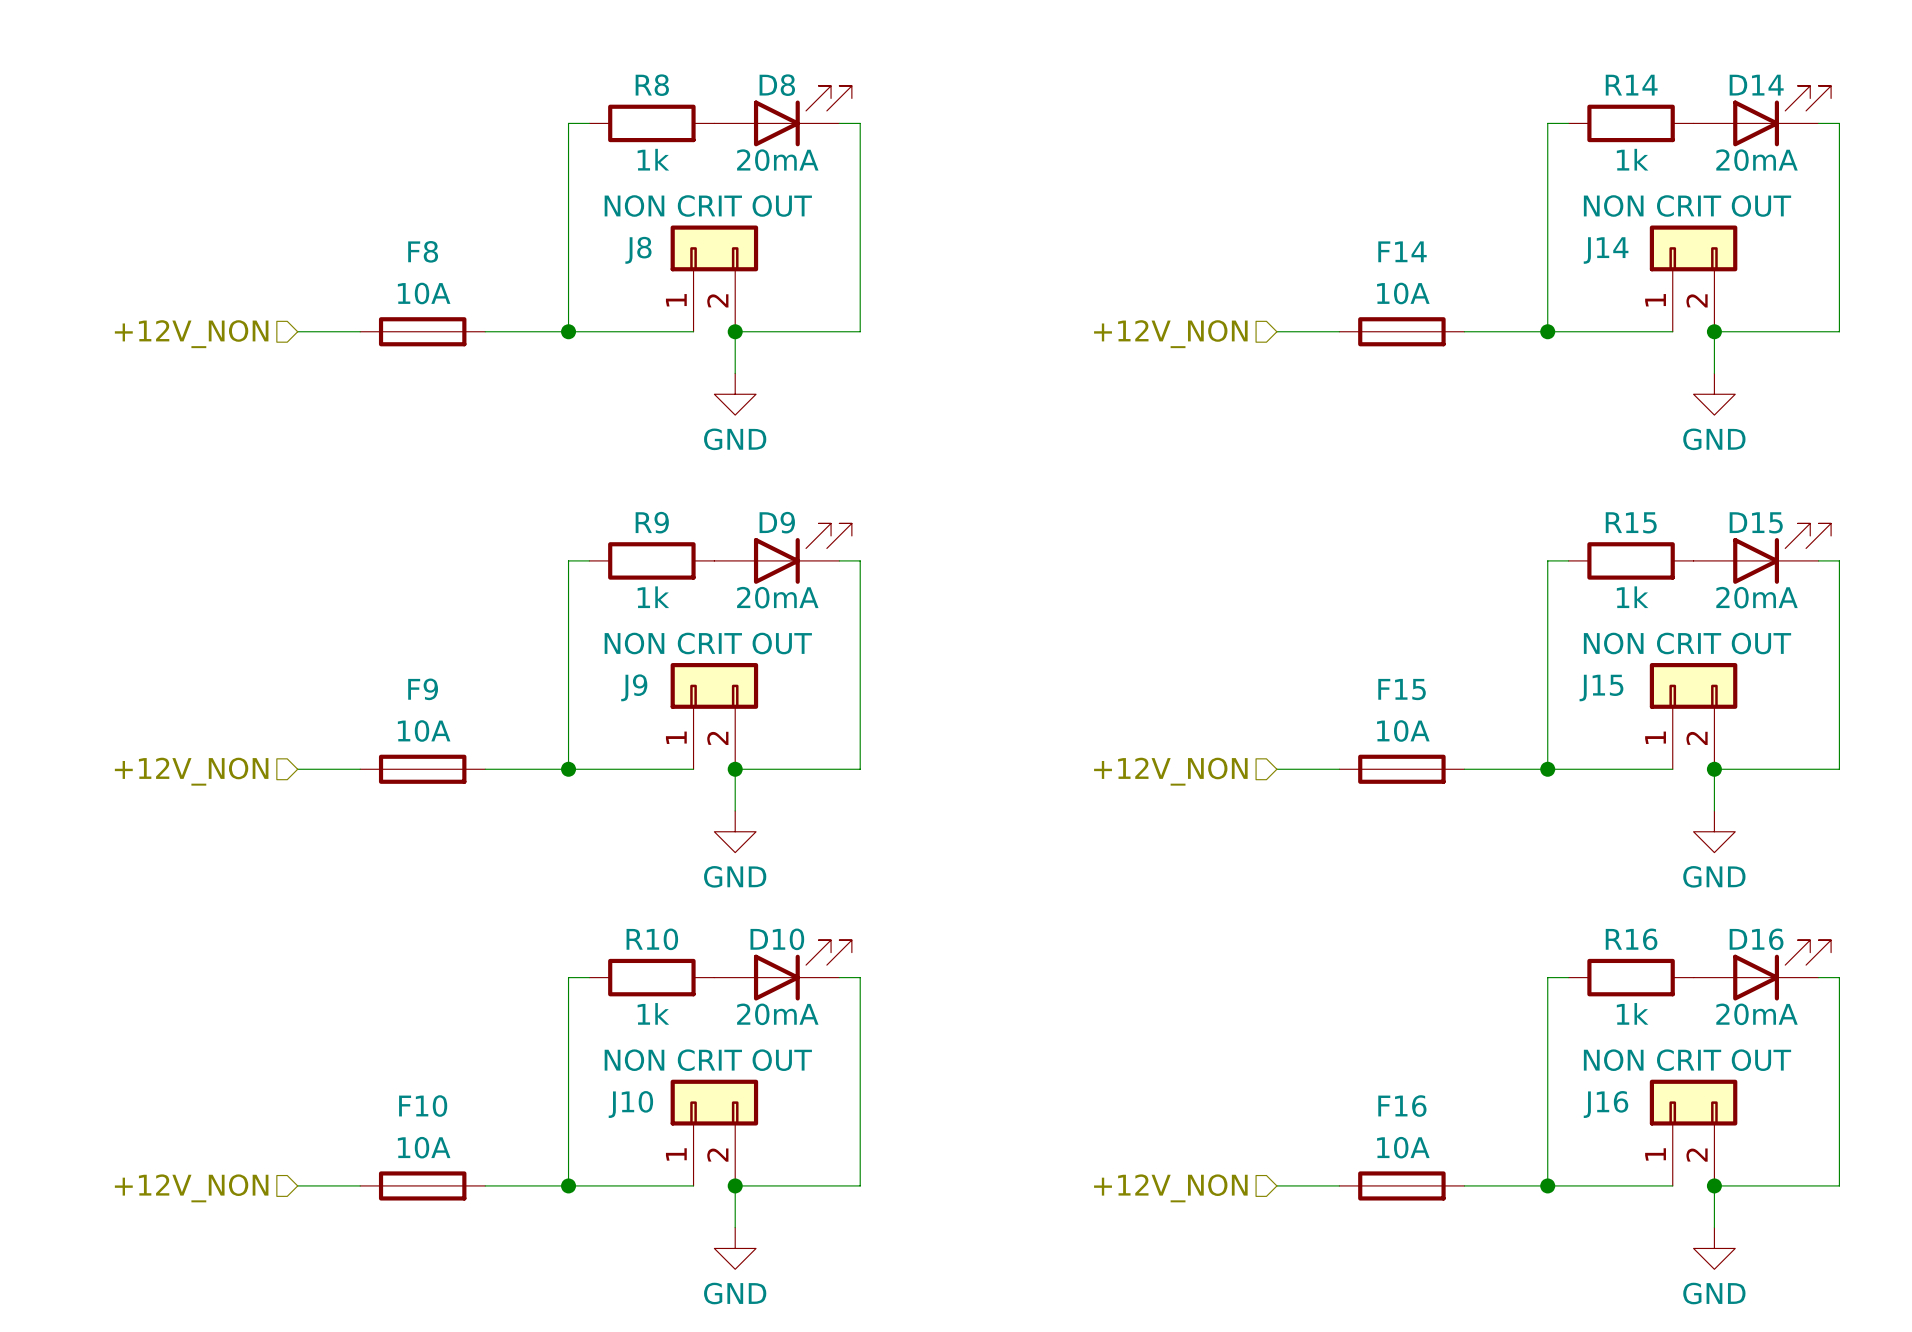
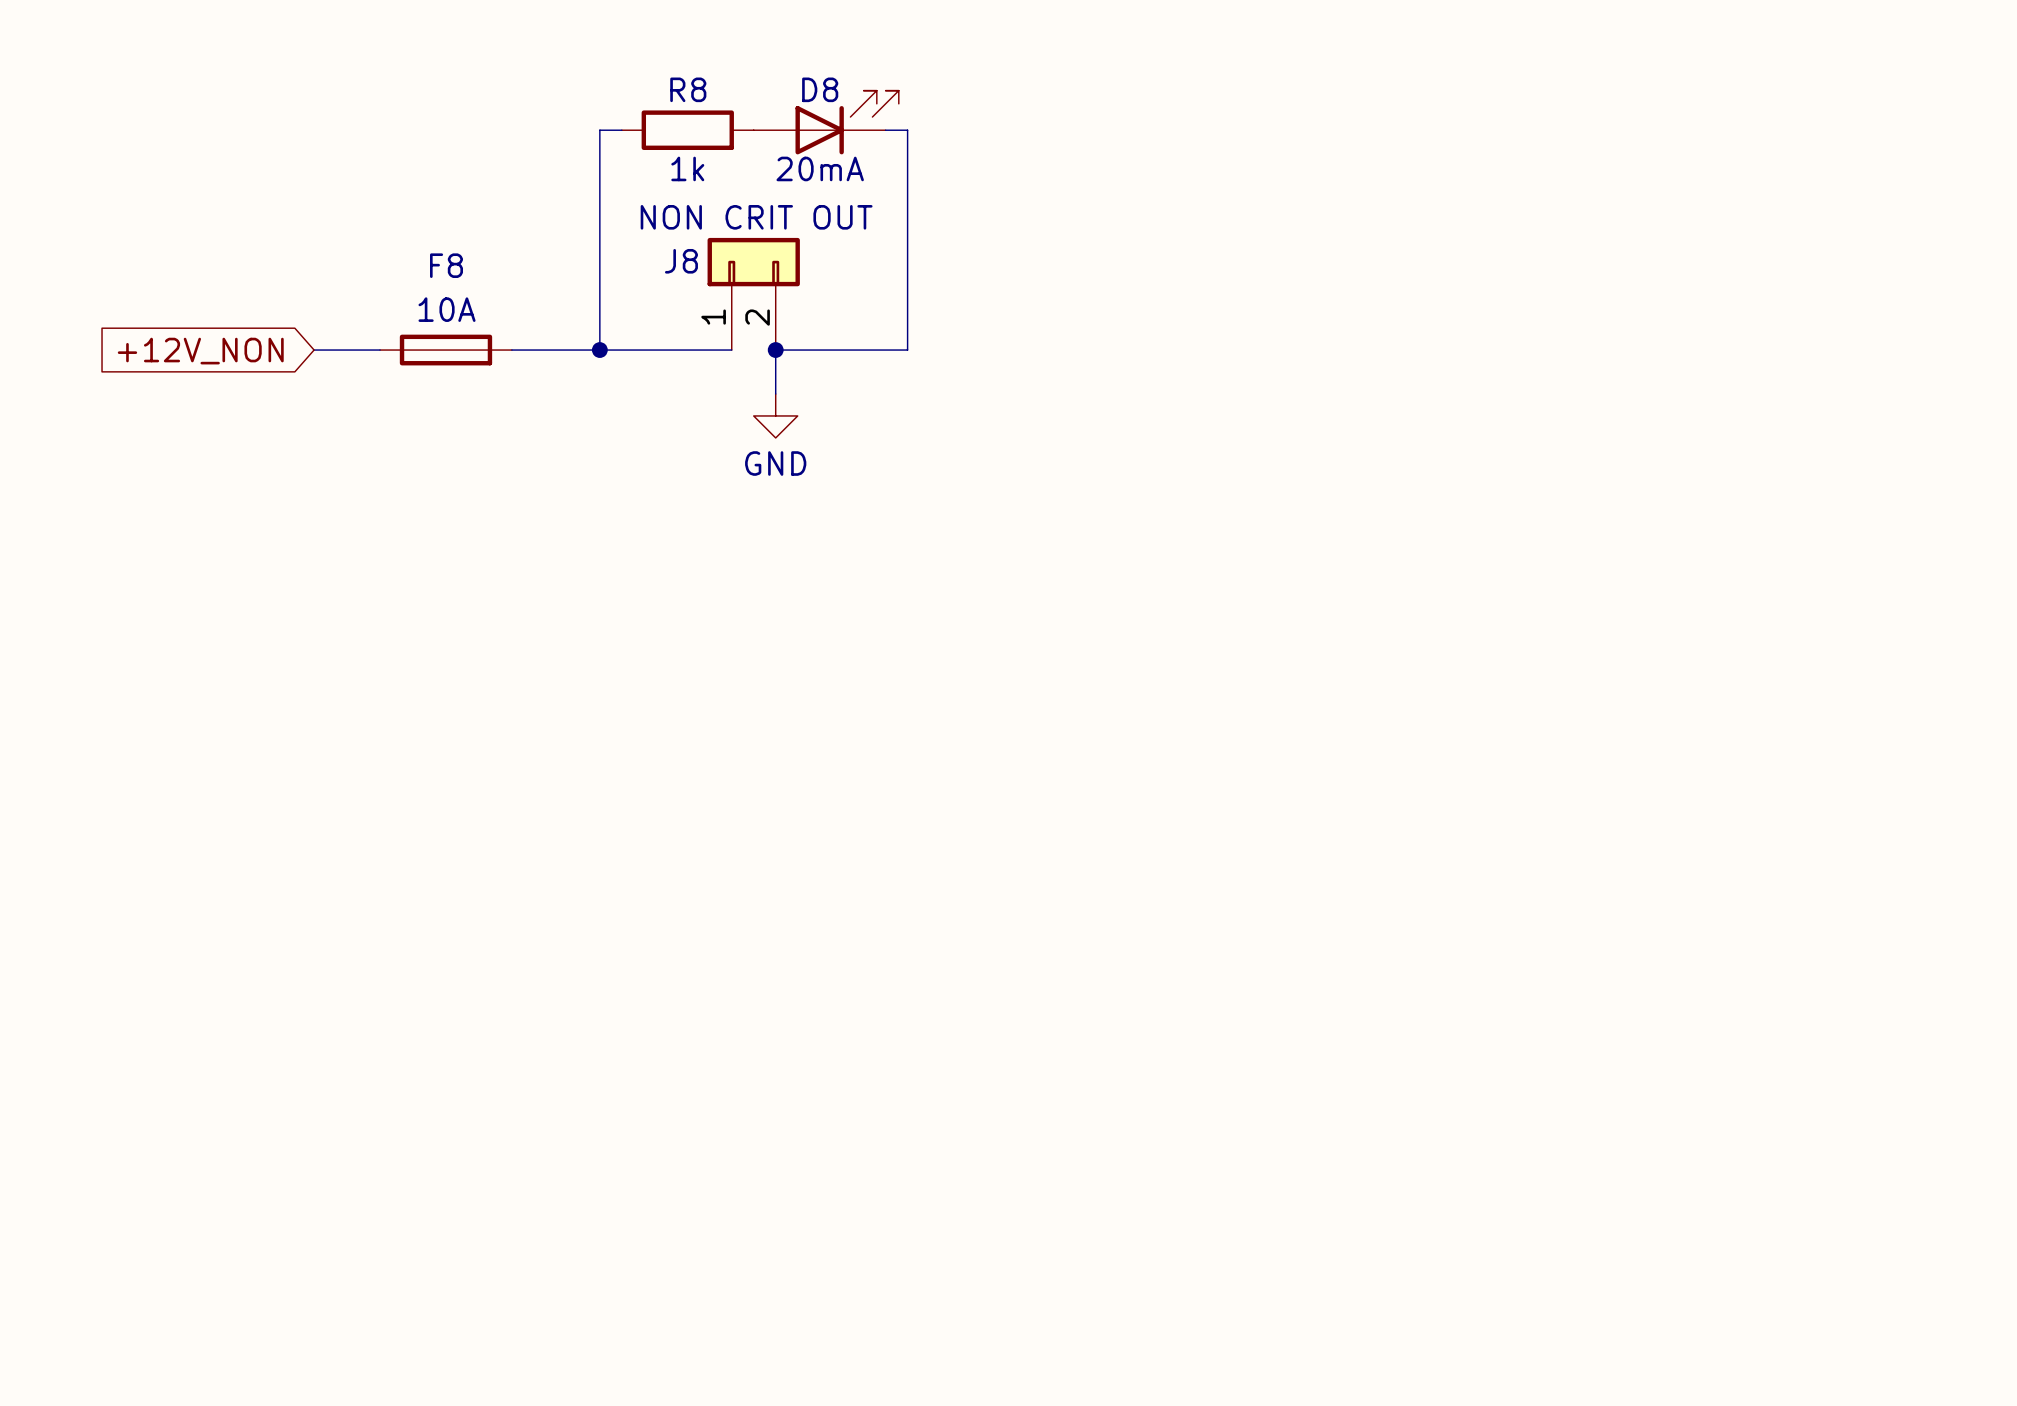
D14: 20mA (1762, 116) -> none
wire: (1568, 123) (1547, 123) (1547, 331) -> none
R14: 1k (1631, 123) -> none
wire: (1818, 123) (1839, 123) (1839, 331) (1714, 331) (1714, 373) -> none
J14: NON CRIT OUT (1693, 278) -> none
wire: (1276, 331) (1339, 331) -> none
F14: 10A (1401, 331) -> none
wire: (1464, 331) (1672, 331) -> none
junction: (1547, 331) -> none
junction: (1714, 331) -> none
hierarchical label: +12V_NON (191, 334) -> none
global label: none -> +12V_NON (200, 351)
hierarchical label: +12V_NON (1170, 334) -> none
power symbol: GND (1714, 394) -> none
D9: 20mA (783, 553) -> none
D15: 20mA (1762, 553) -> none
wire: (589, 560) (568, 560) (568, 769) -> none
R9: 1k (651, 560) -> none
wire: (839, 560) (860, 560) (860, 769) (735, 769) (735, 810) -> none
wire: (1568, 560) (1547, 560) (1547, 769) -> none
R15: 1k (1631, 560) -> none
wire: (1818, 560) (1839, 560) (1839, 769) (1714, 769) (1714, 810) -> none
J9: NON CRIT OUT (714, 716) -> none
J15: NON CRIT OUT (1693, 716) -> none
wire: (297, 769) (360, 769) -> none
F9: 10A (422, 769) -> none
wire: (485, 769) (693, 769) -> none
junction: (568, 769) -> none
junction: (735, 769) -> none
wire: (1276, 769) (1339, 769) -> none
F15: 10A (1401, 769) -> none
wire: (1464, 769) (1672, 769) -> none
junction: (1547, 769) -> none
junction: (1714, 769) -> none
hierarchical label: +12V_NON (191, 771) -> none
hierarchical label: +12V_NON (1170, 771) -> none
power symbol: GND (735, 831) -> none
power symbol: GND (1714, 831) -> none
D10: 20mA (783, 970) -> none
D16: 20mA (1762, 970) -> none
wire: (589, 977) (568, 977) (568, 1185) -> none
R10: 1k (651, 977) -> none
wire: (839, 977) (860, 977) (860, 1185) (735, 1185) (735, 1227) -> none
wire: (1568, 977) (1547, 977) (1547, 1185) -> none
R16: 1k (1631, 977) -> none
wire: (1818, 977) (1839, 977) (1839, 1185) (1714, 1185) (1714, 1227) -> none
J10: NON CRIT OUT (714, 1132) -> none
J16: NON CRIT OUT (1693, 1132) -> none
wire: (297, 1185) (360, 1185) -> none
F10: 10A (422, 1185) -> none
wire: (485, 1185) (693, 1185) -> none
junction: (568, 1185) -> none
junction: (735, 1185) -> none
wire: (1276, 1185) (1339, 1185) -> none
F16: 10A (1401, 1185) -> none
wire: (1464, 1185) (1672, 1185) -> none
junction: (1547, 1185) -> none
junction: (1714, 1185) -> none
hierarchical label: +12V_NON (191, 1188) -> none
hierarchical label: +12V_NON (1170, 1188) -> none
power symbol: GND (735, 1248) -> none
power symbol: GND (1714, 1248) -> none

